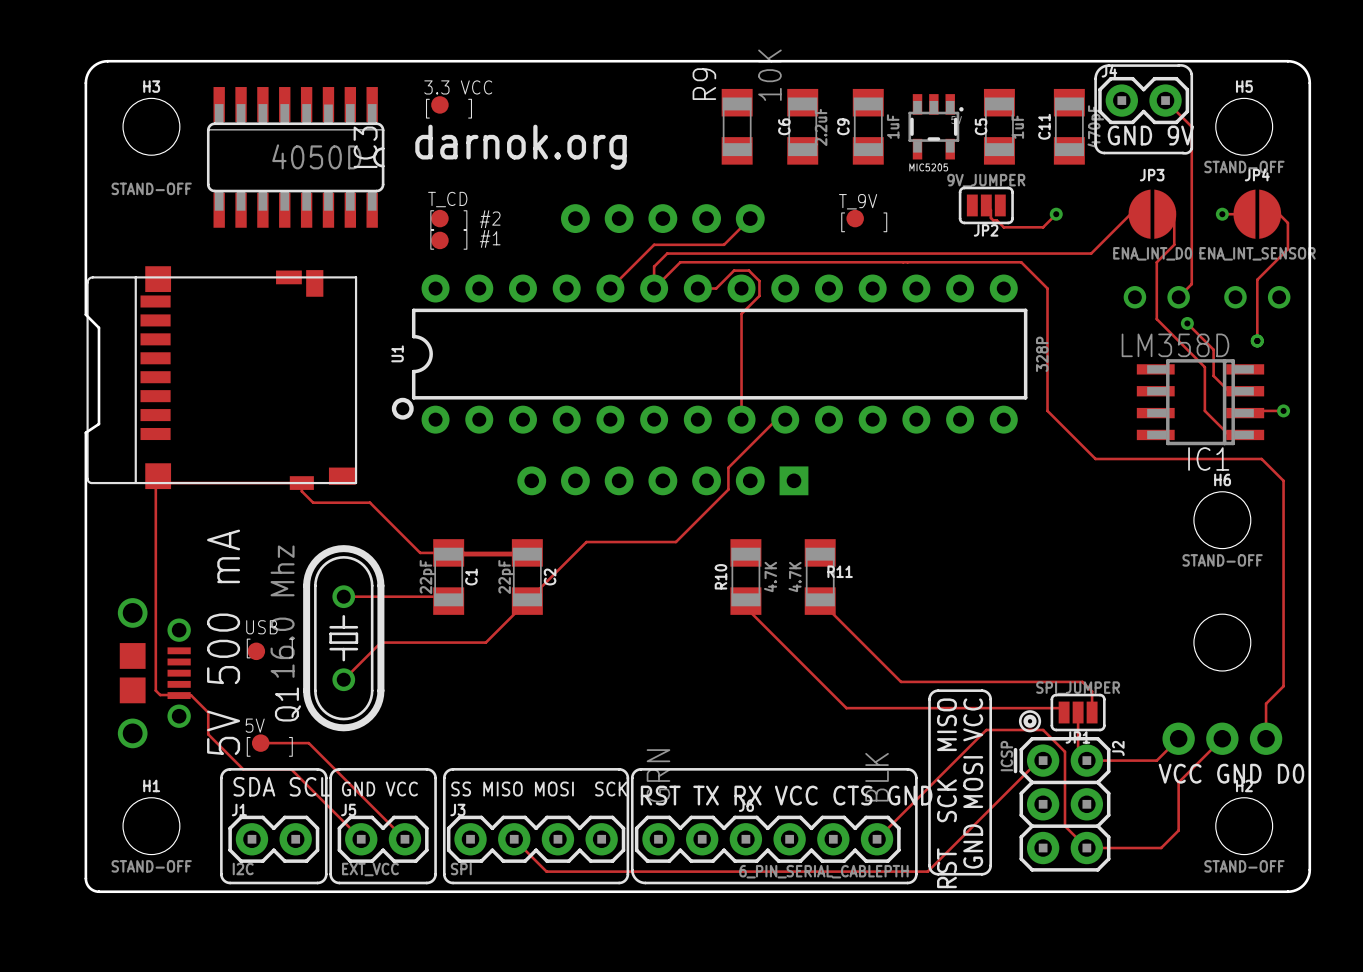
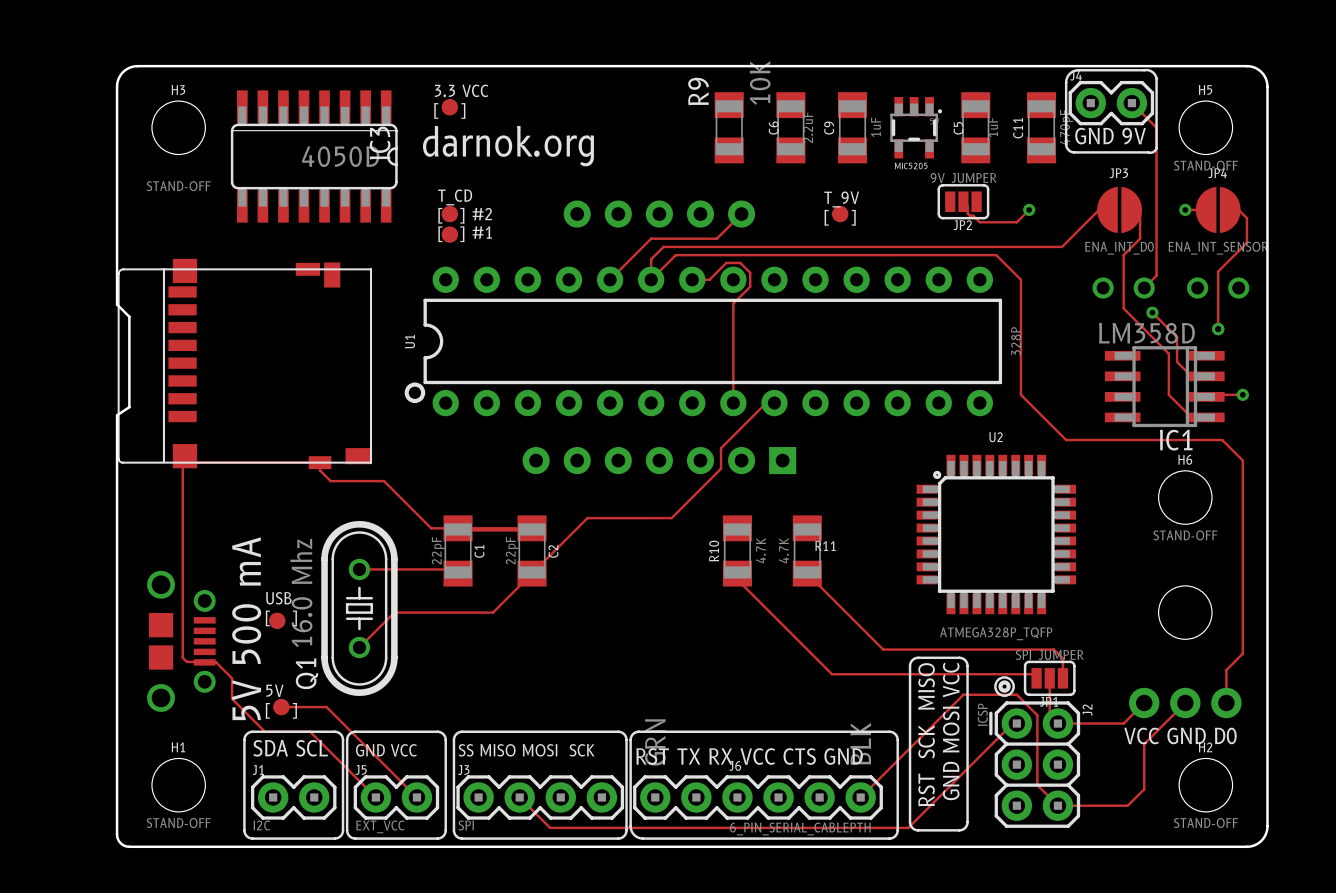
U2: none -> ATMEGA328P_TQFP (996, 534)

